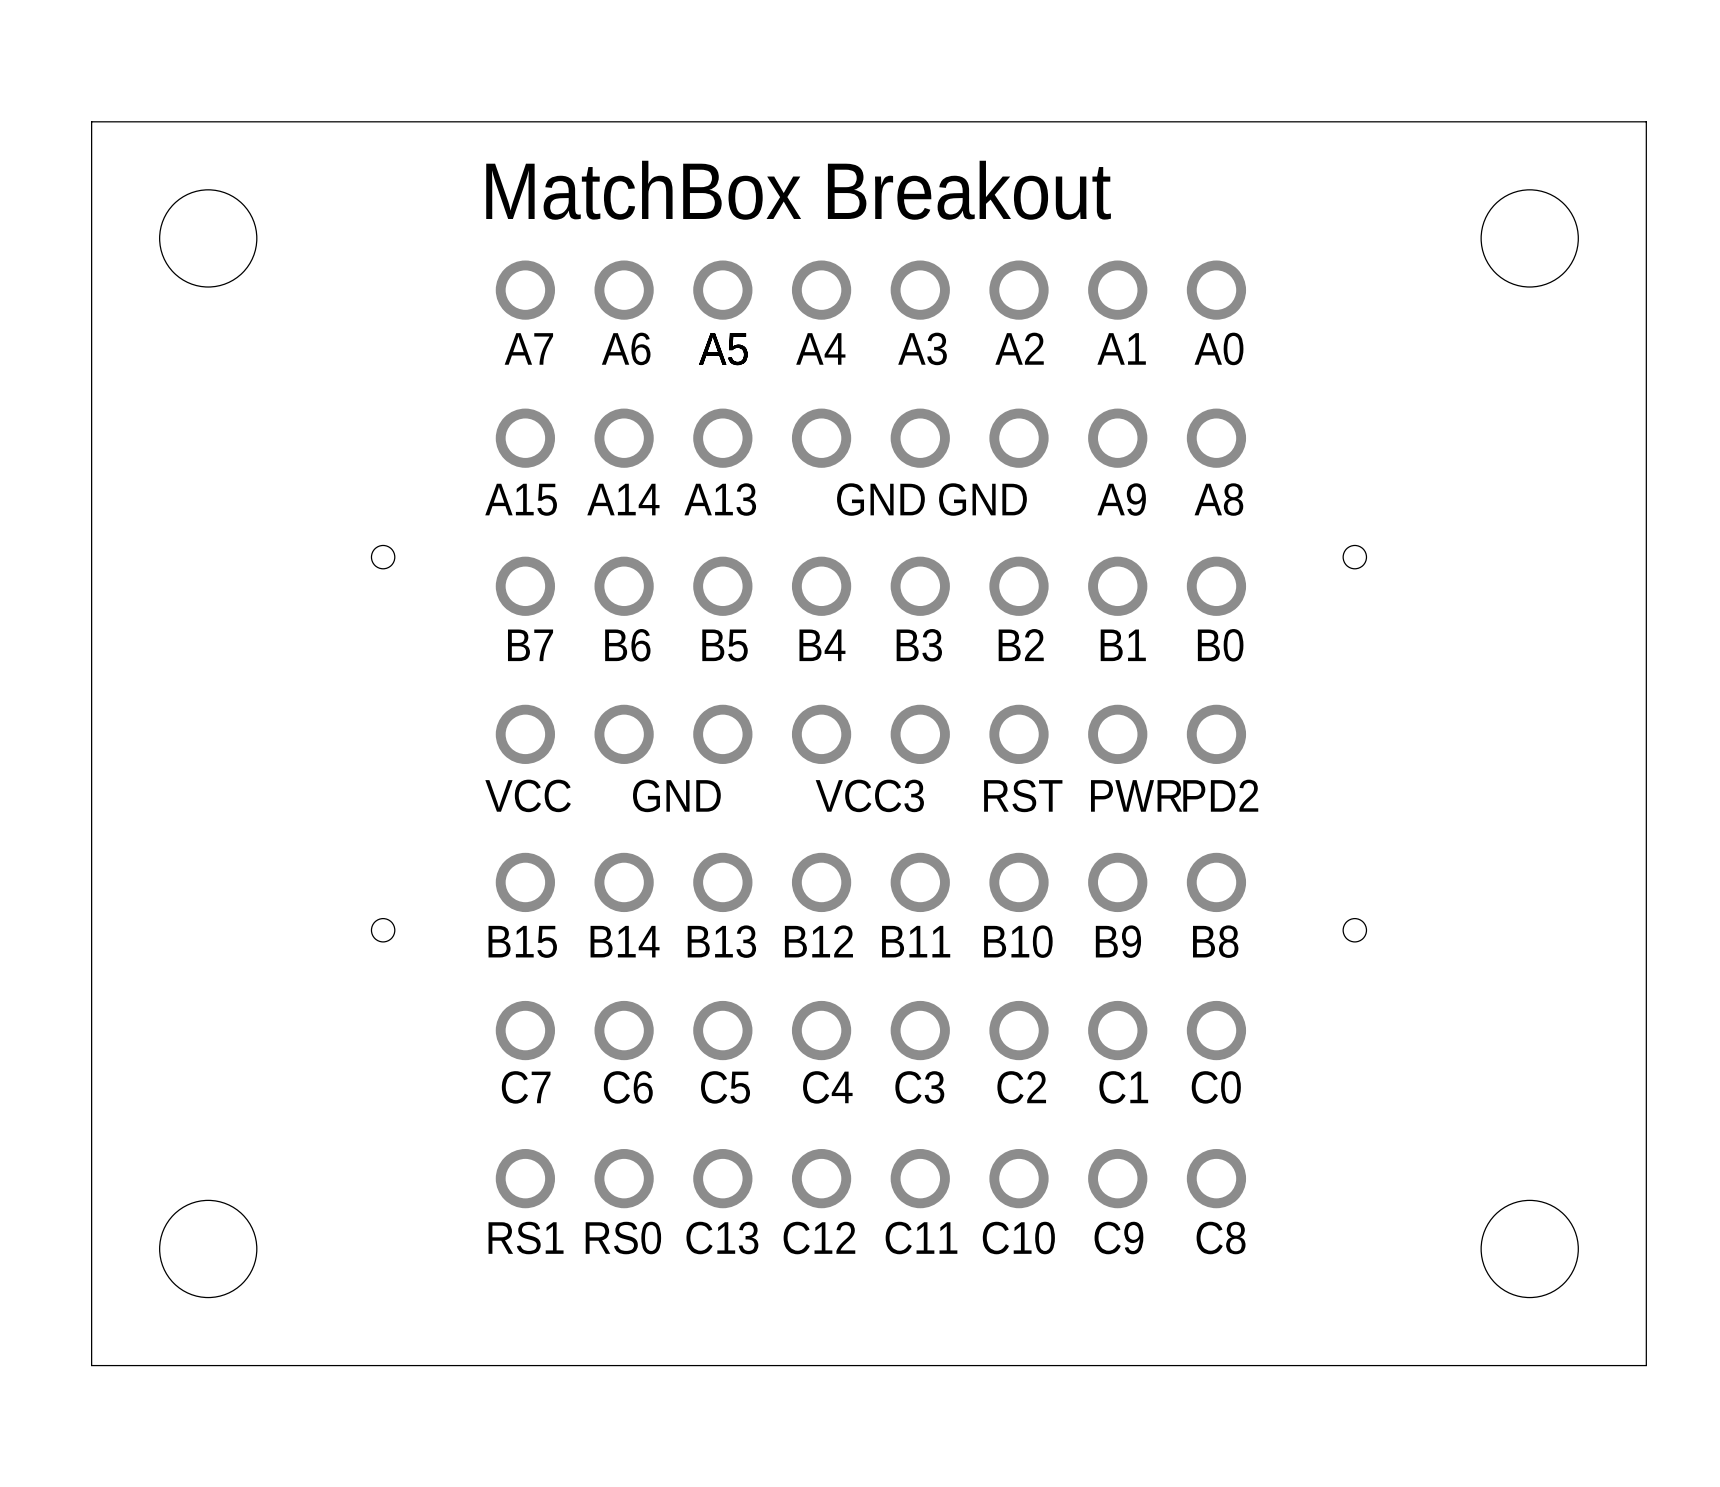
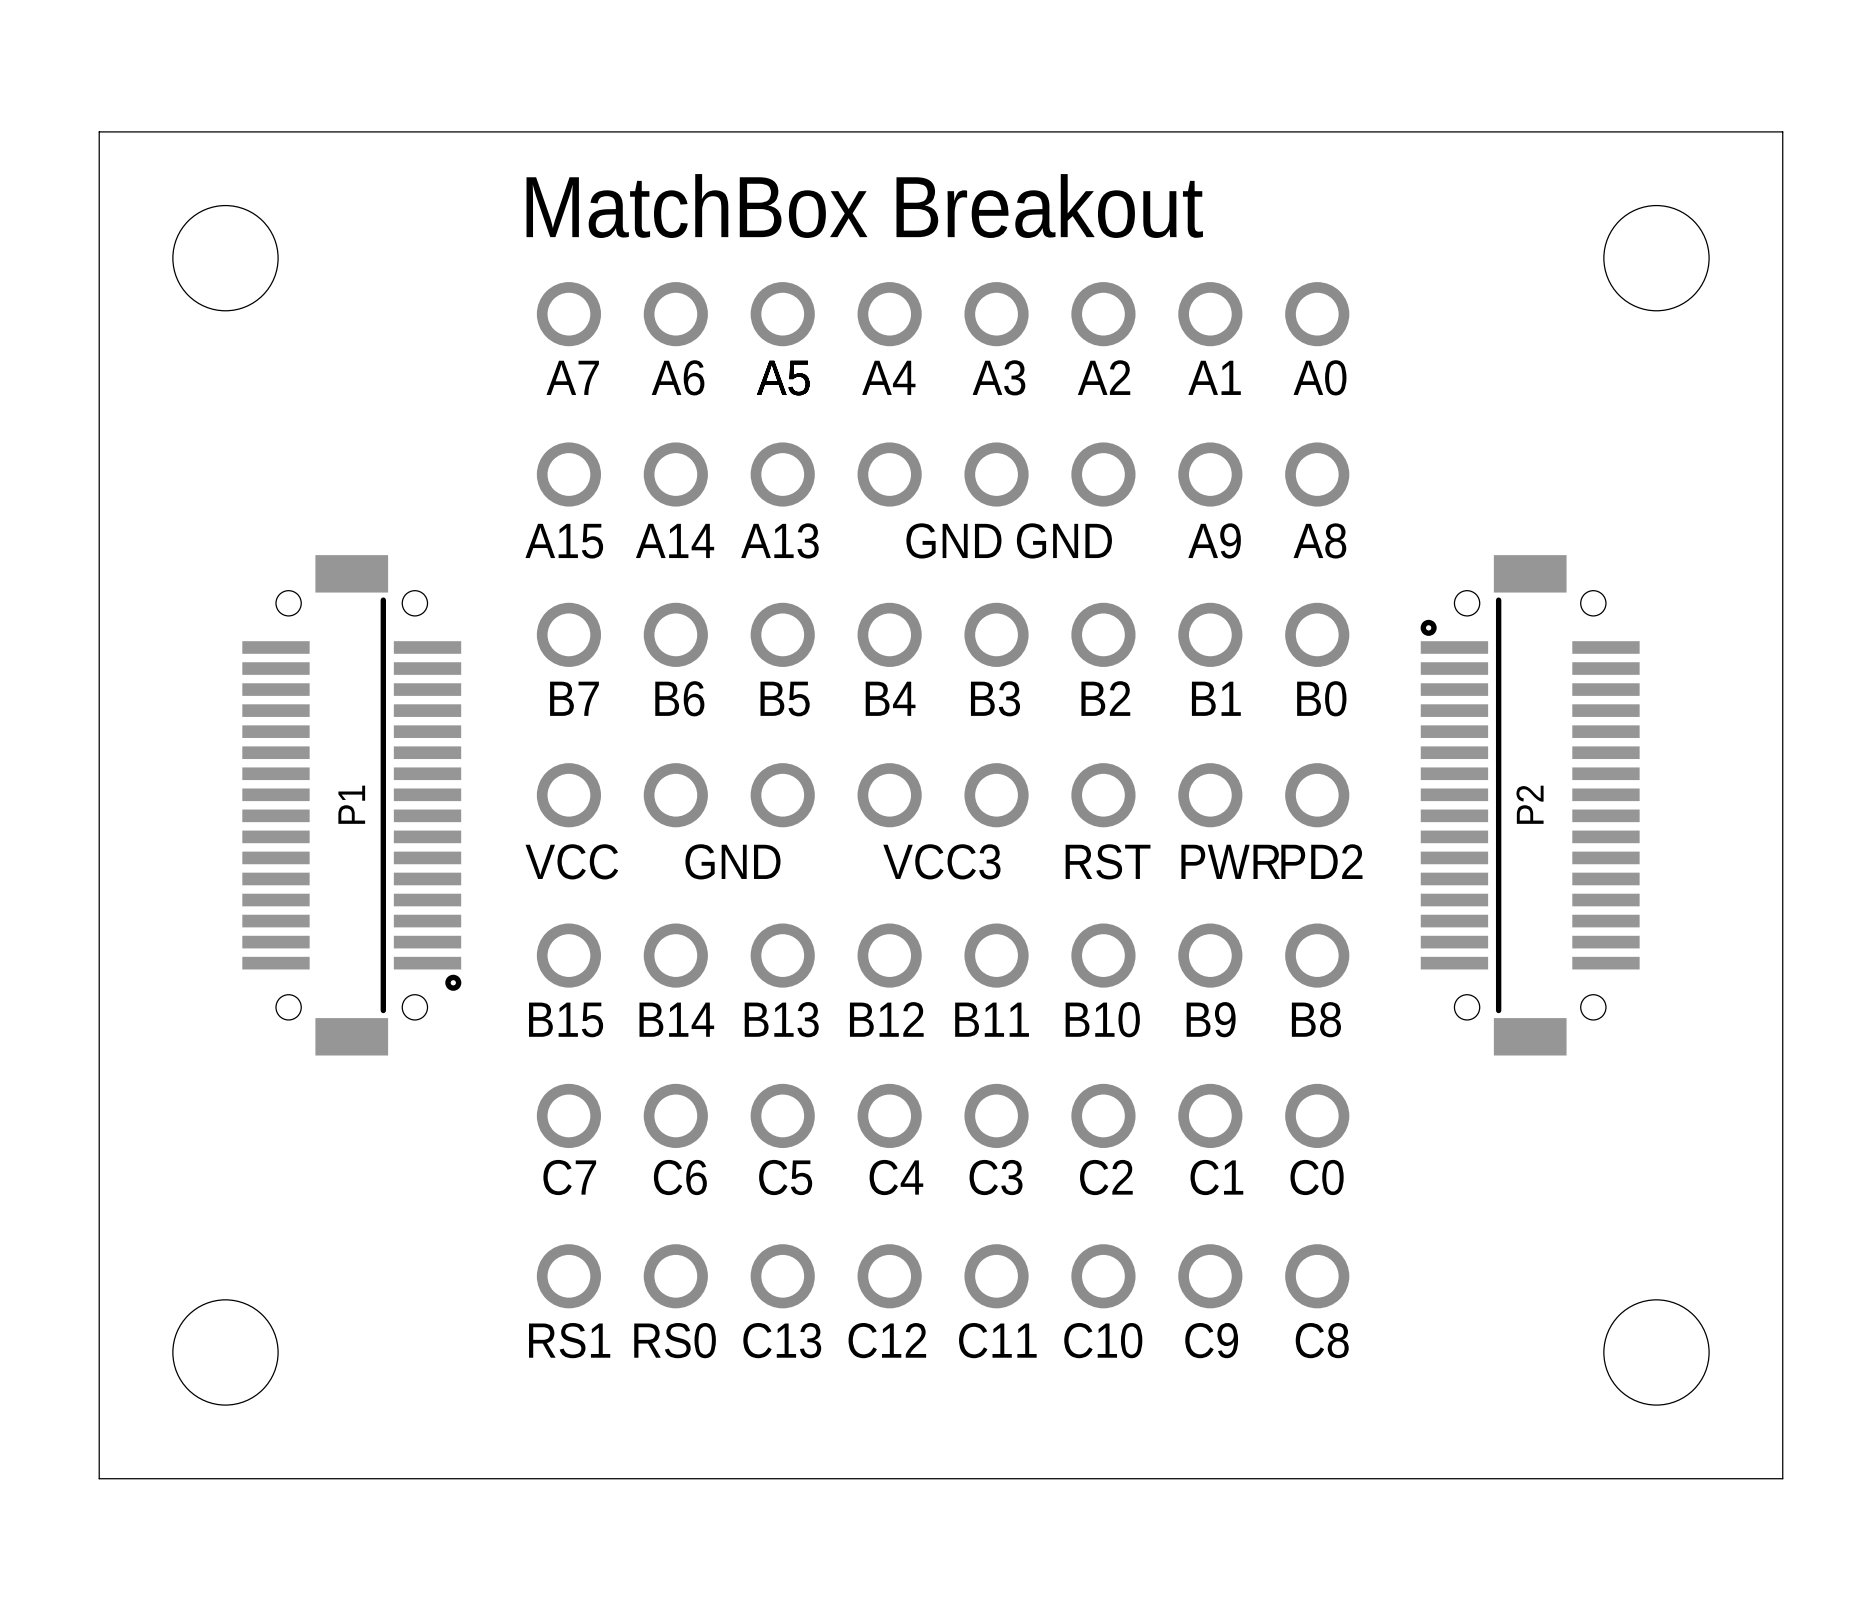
P1: none -> (351, 805)
P2: none -> (1530, 805)

